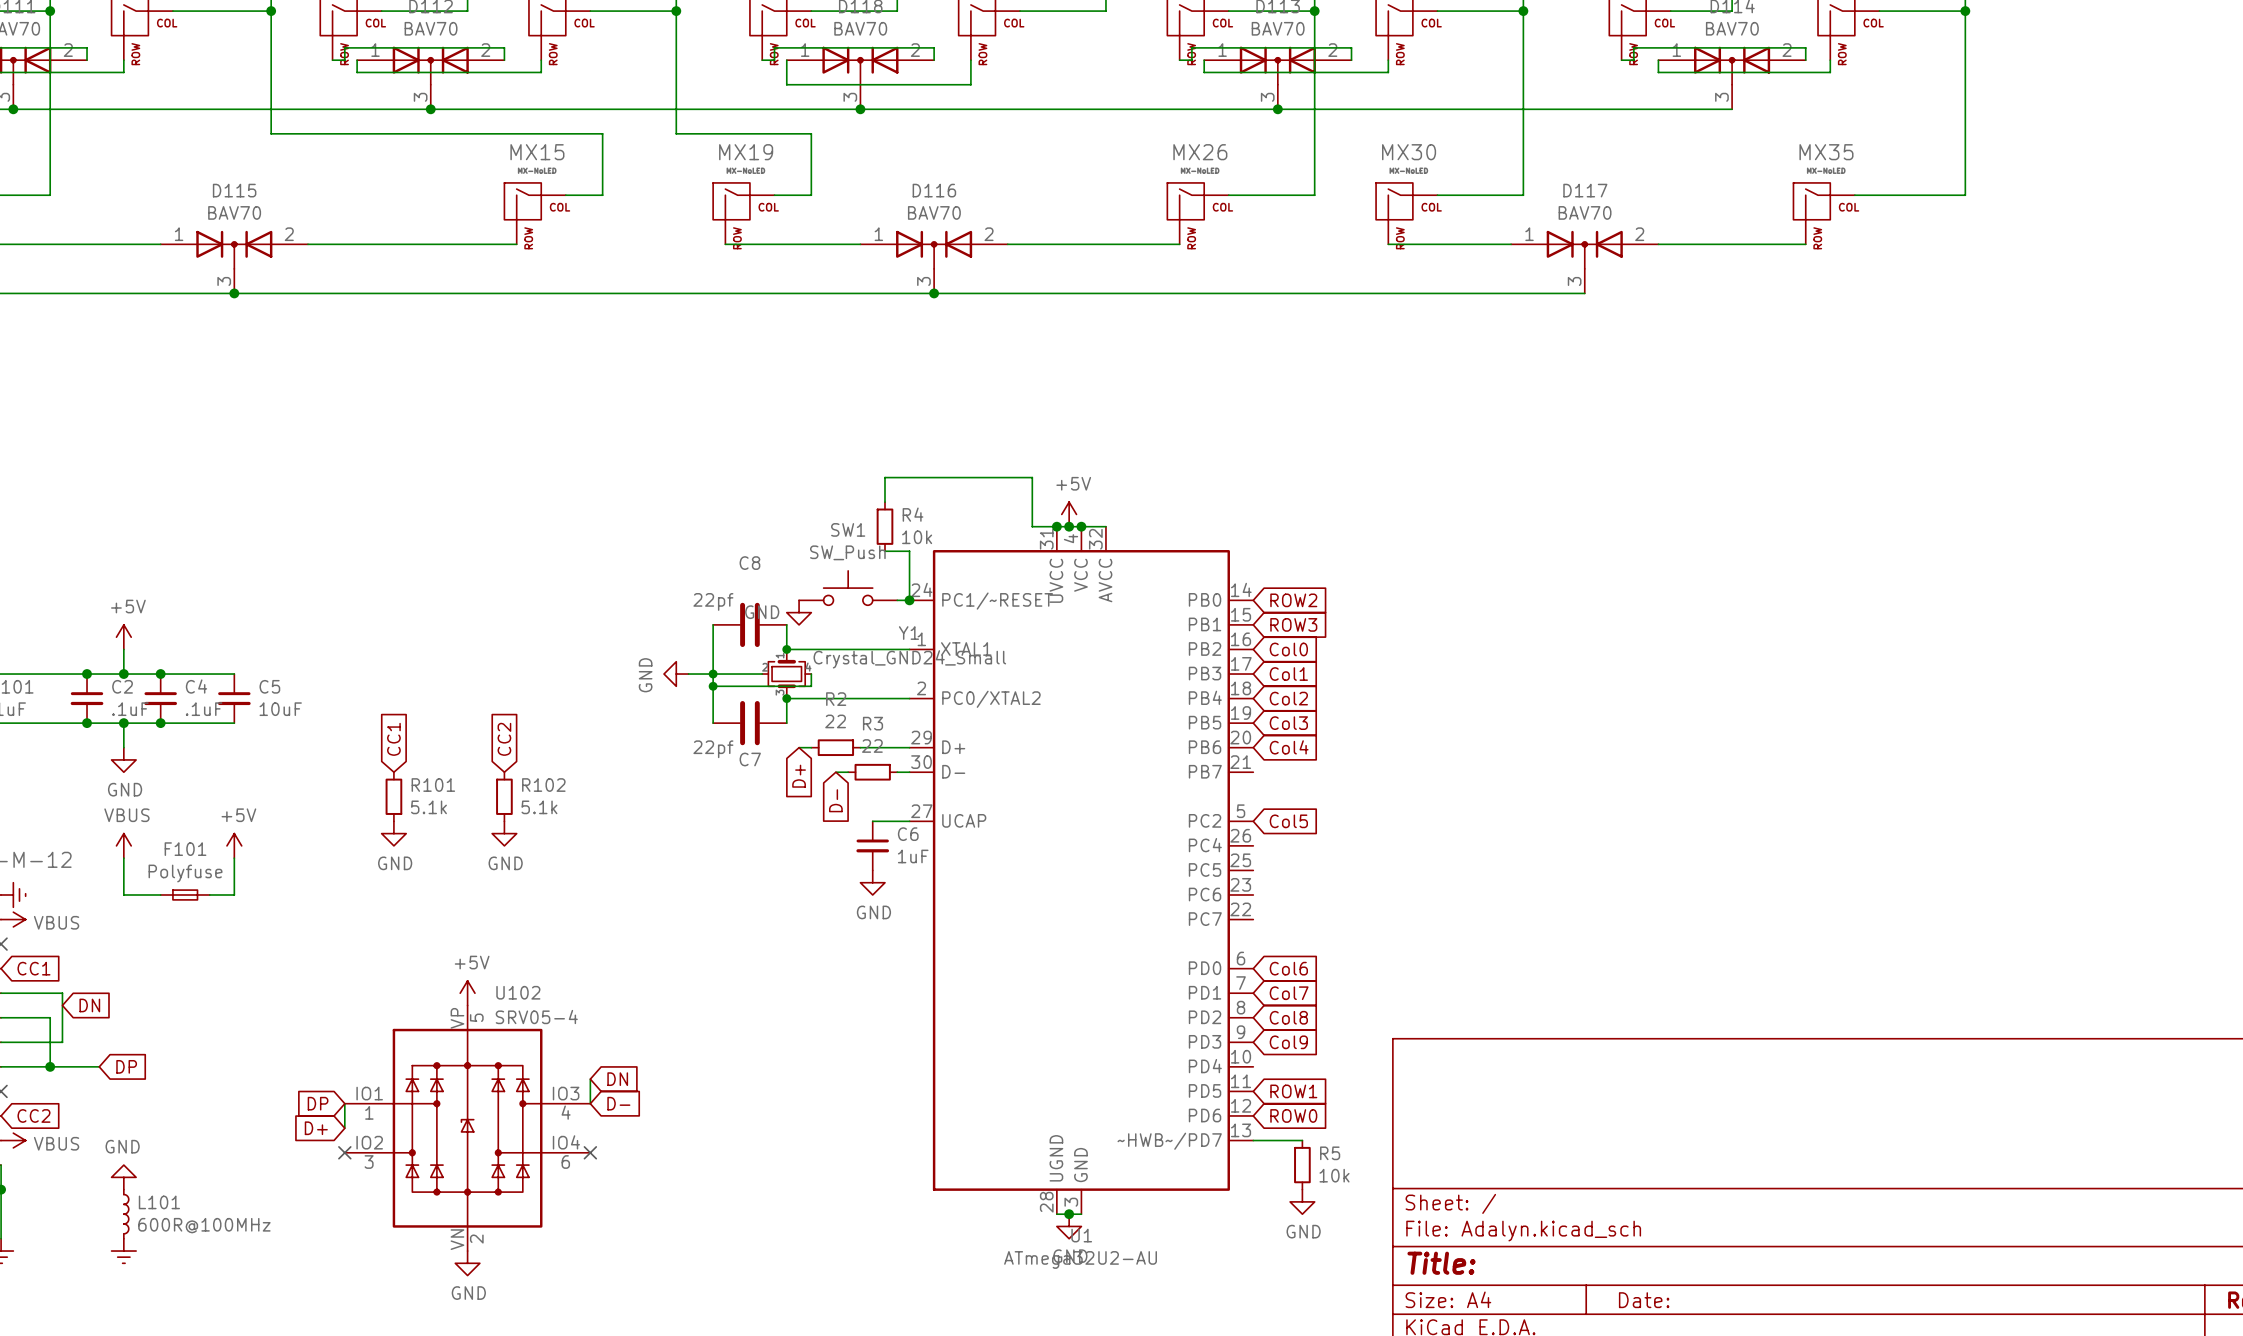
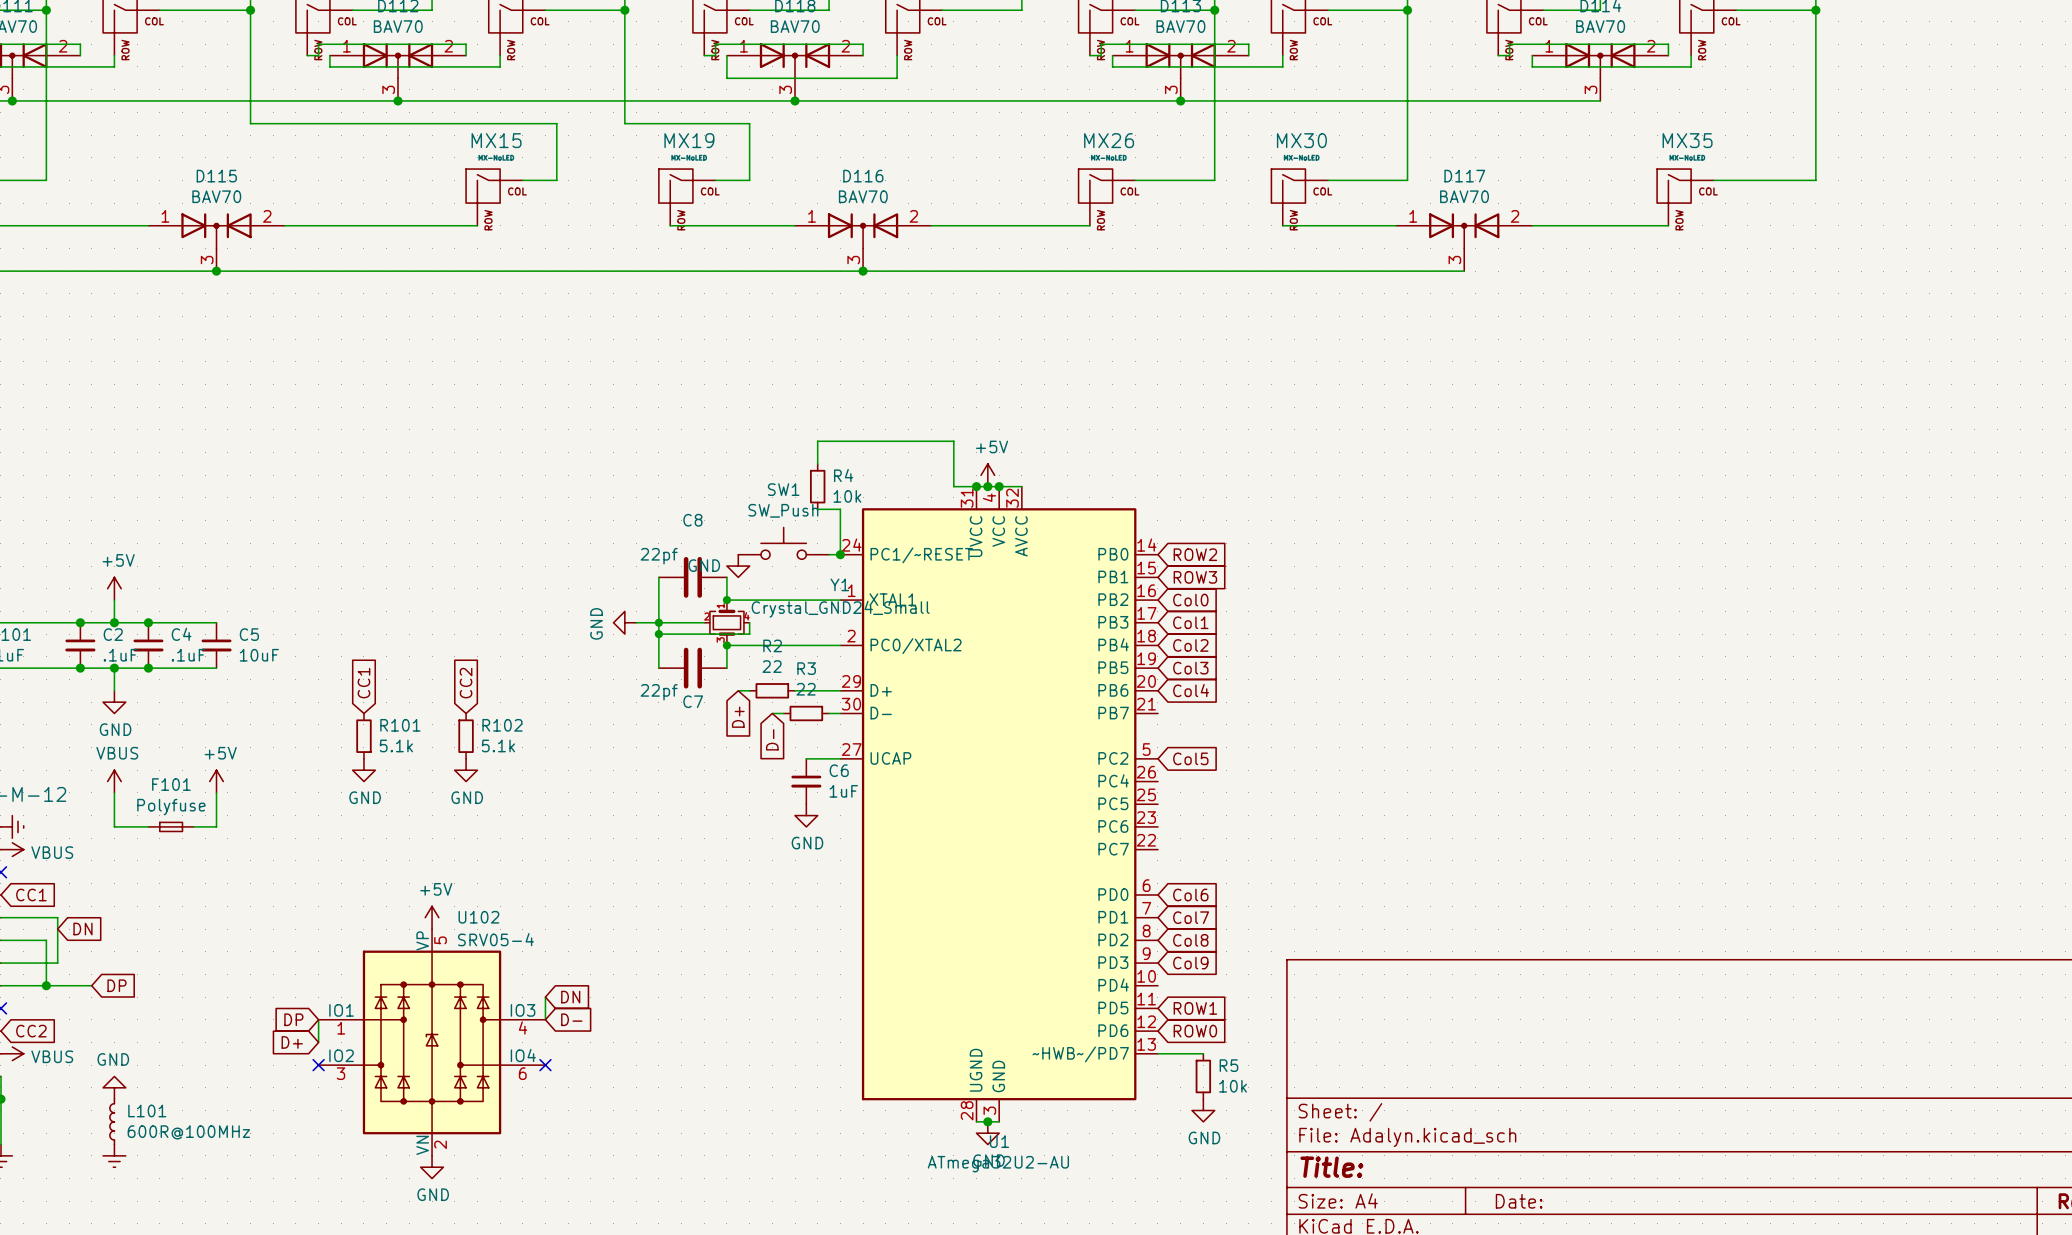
L101 rotation: 0° (126, 1214) -> 180° (112, 1121)

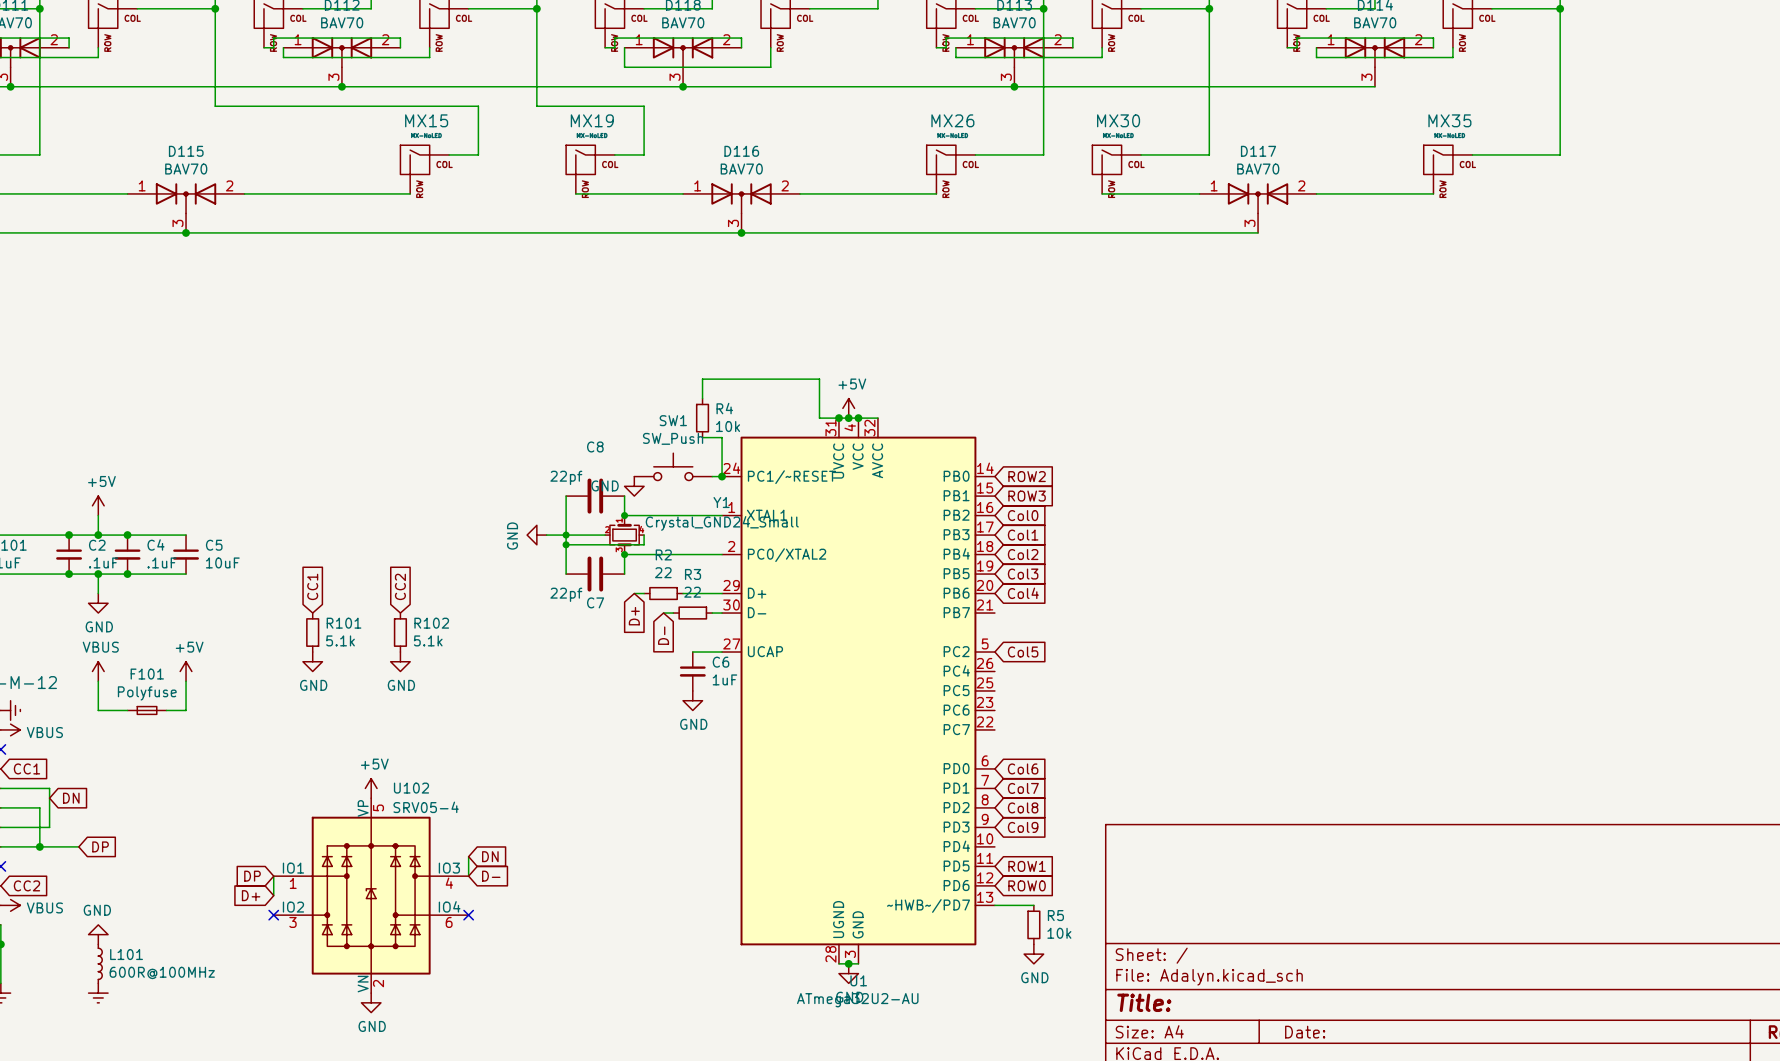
L101 rotation: 0° (112, 1121) -> 180° (100, 963)

